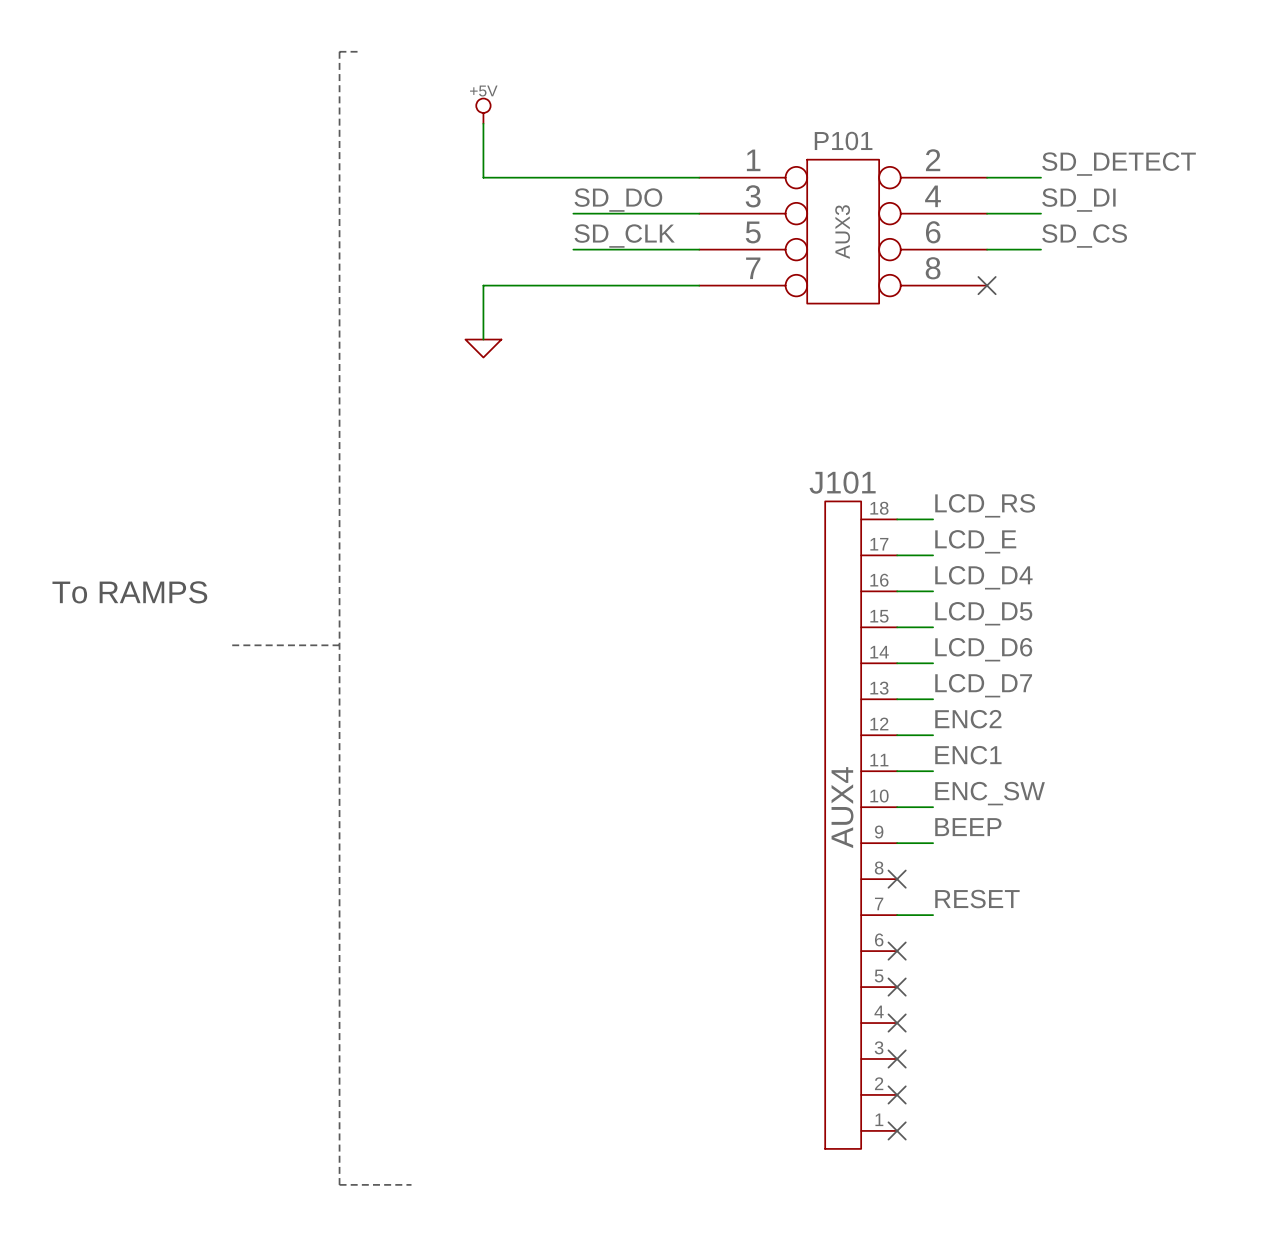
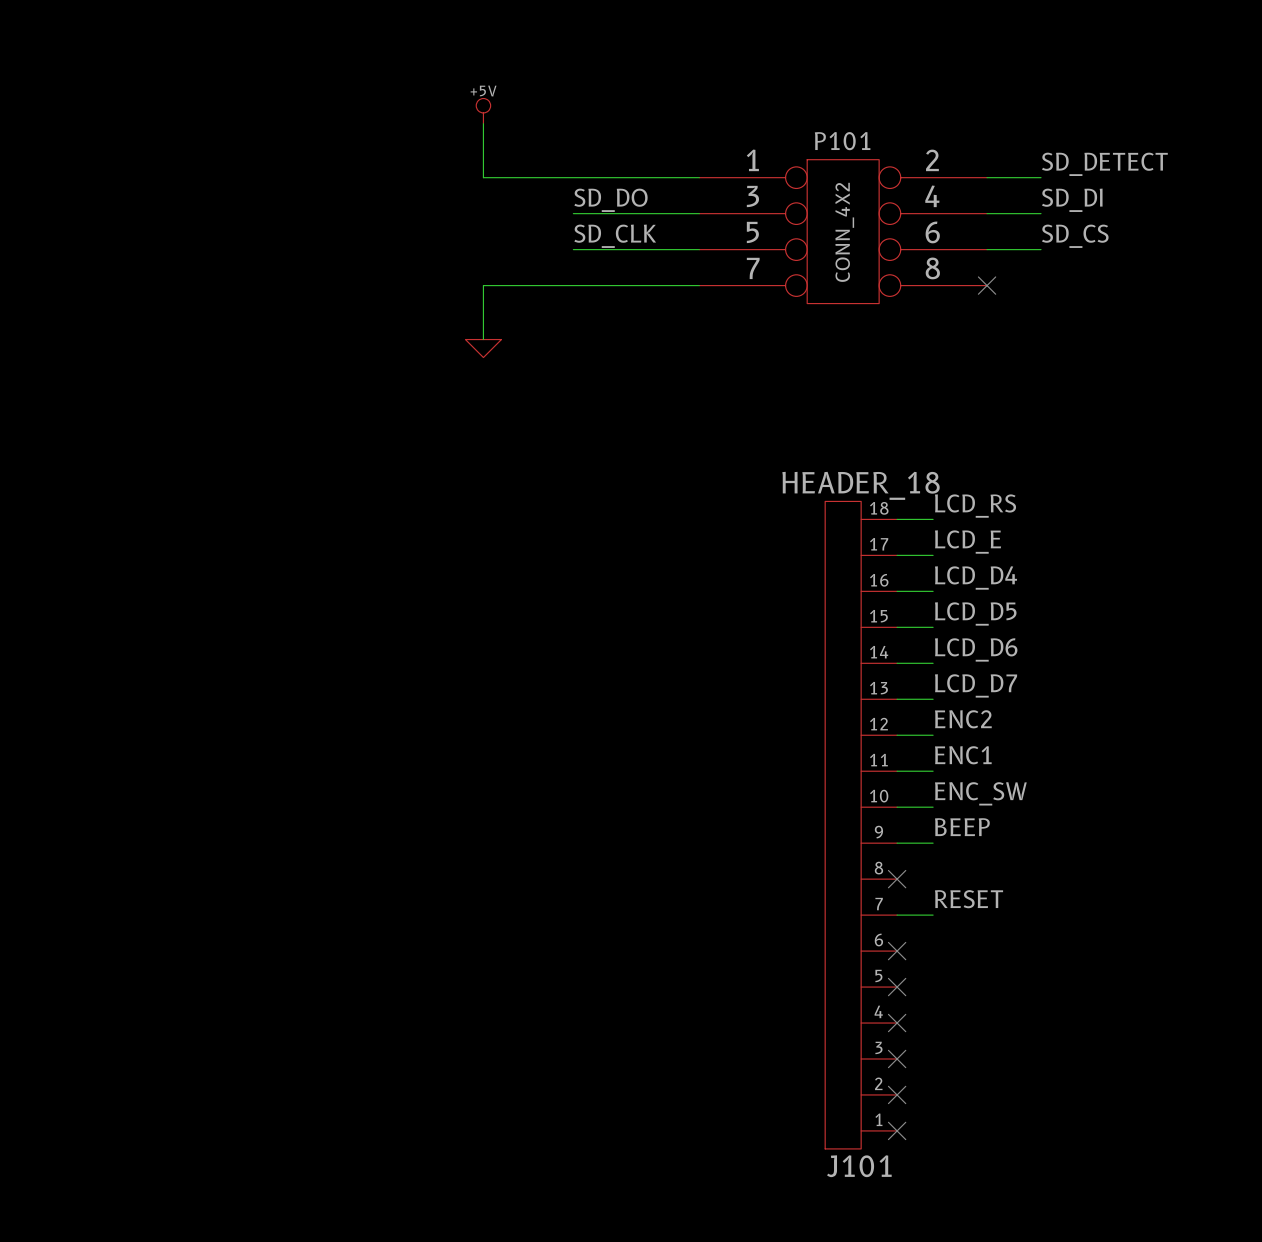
line: (357, 51) (339, 51) (339, 1184) (411, 1184) -> none
P101 value: AUX3 (842, 232) -> CONN_4X2 (844, 232)
J101 name position: J101 (842, 482) -> J101 (859, 1166)
text: To RAMPS (129, 592) -> none
line: (231, 645) (339, 645) -> none
J101 value: AUX4 (842, 807) -> HEADER_18 (861, 485)

